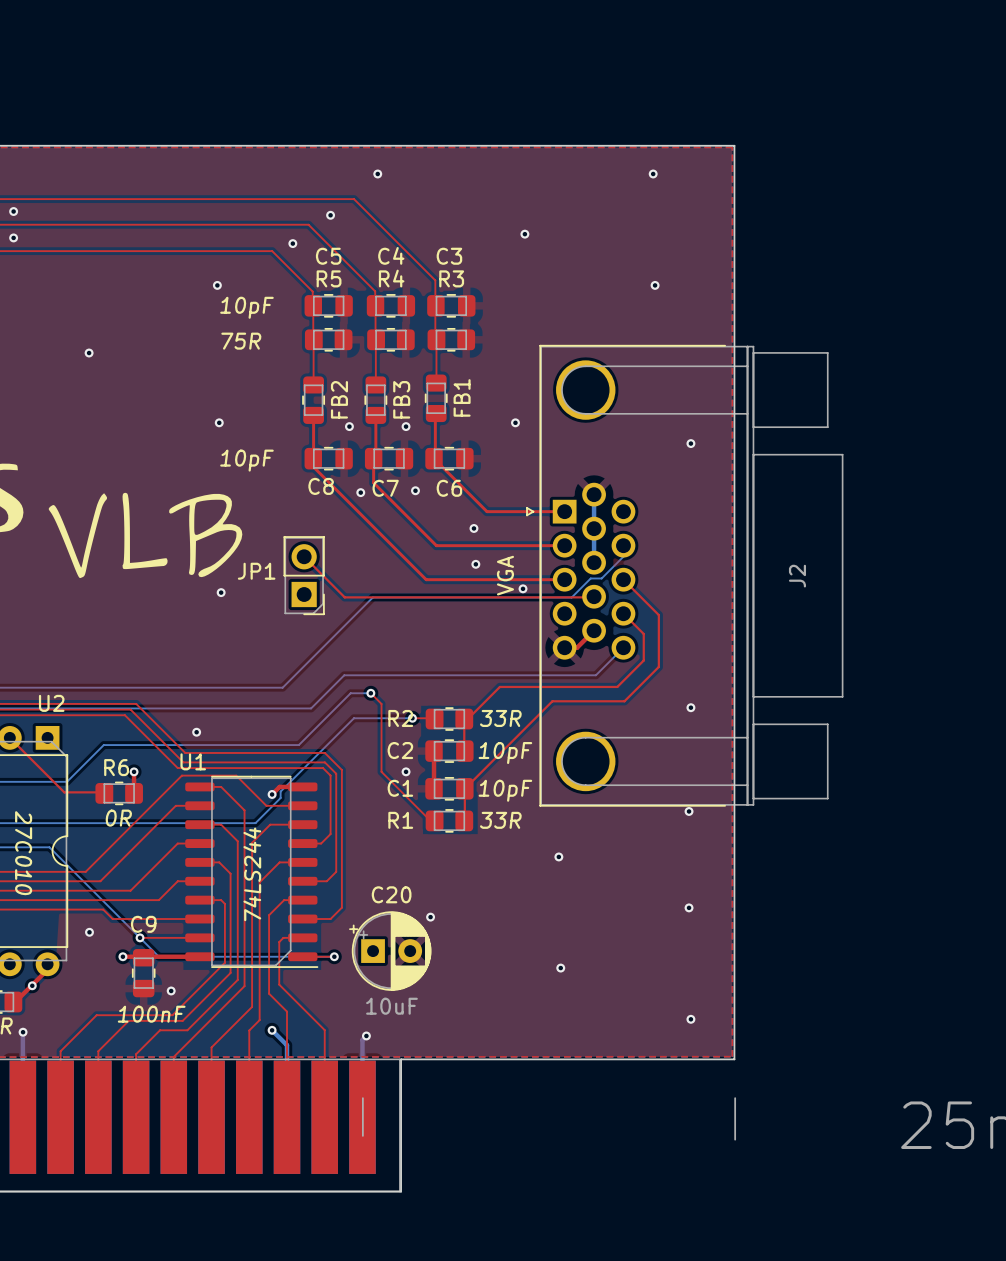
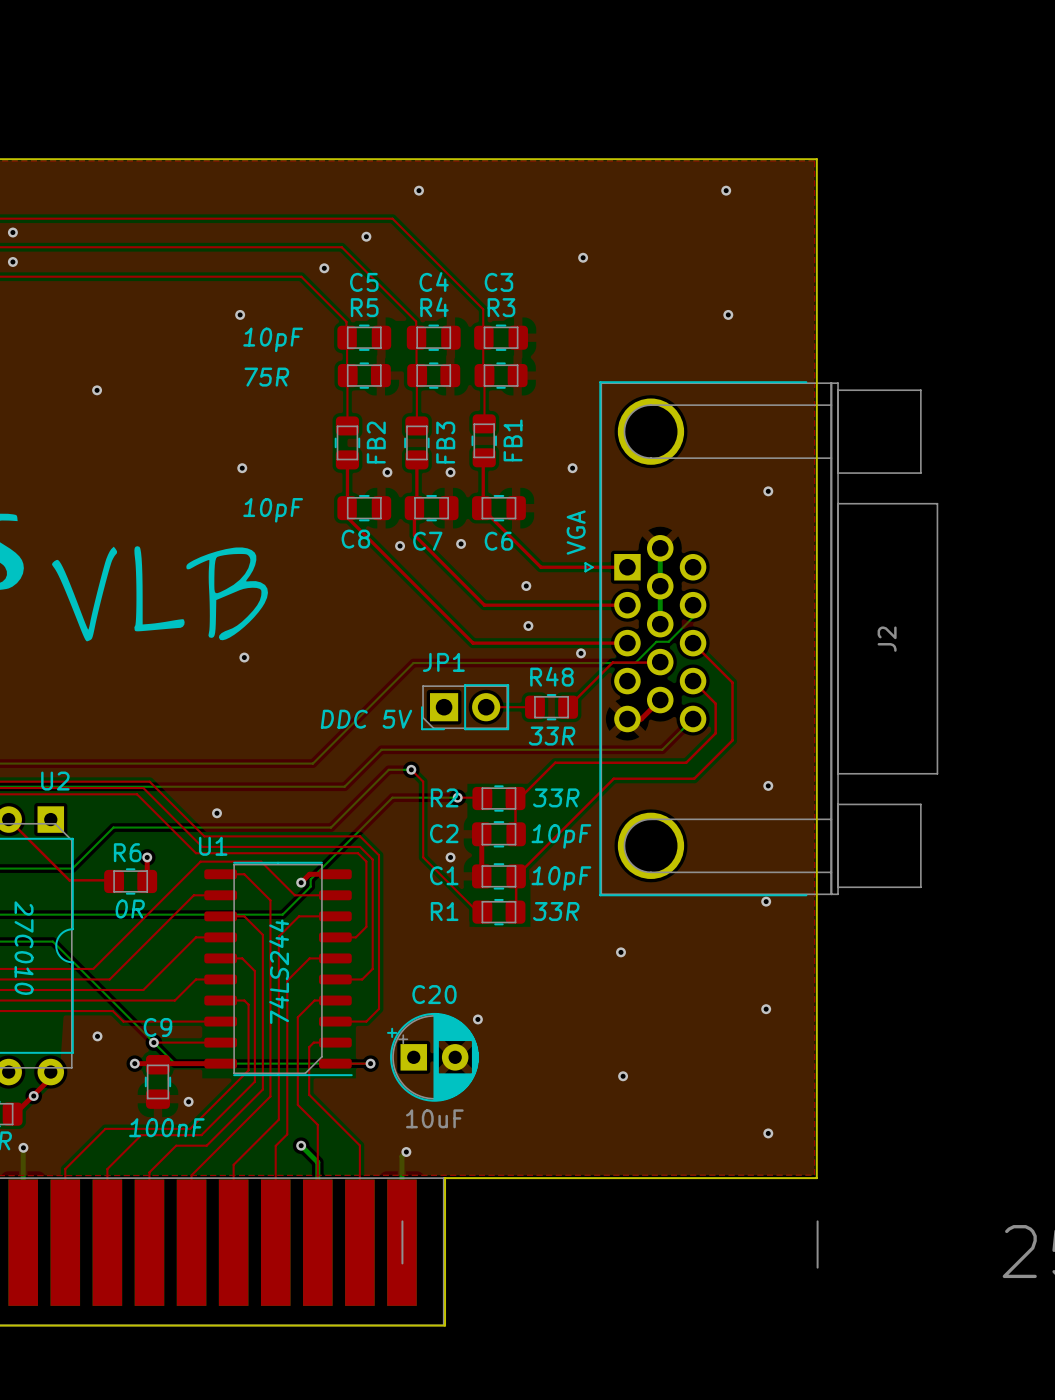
top track: (304, 556) (344, 597) (593, 597) -> (568, 707) (612, 662) (659, 662)
JP1 rotation: 0° (304, 575) -> 90° clockwise (465, 707)
JP1 position: (304, 575) -> (465, 707)
J2 value position: VGA (505, 575) -> VGA (576, 532)
top track: none -> (486, 707) (534, 707)
R48: none -> 33R (551, 707)
JP1 value: none -> DDC 5V (366, 719)

